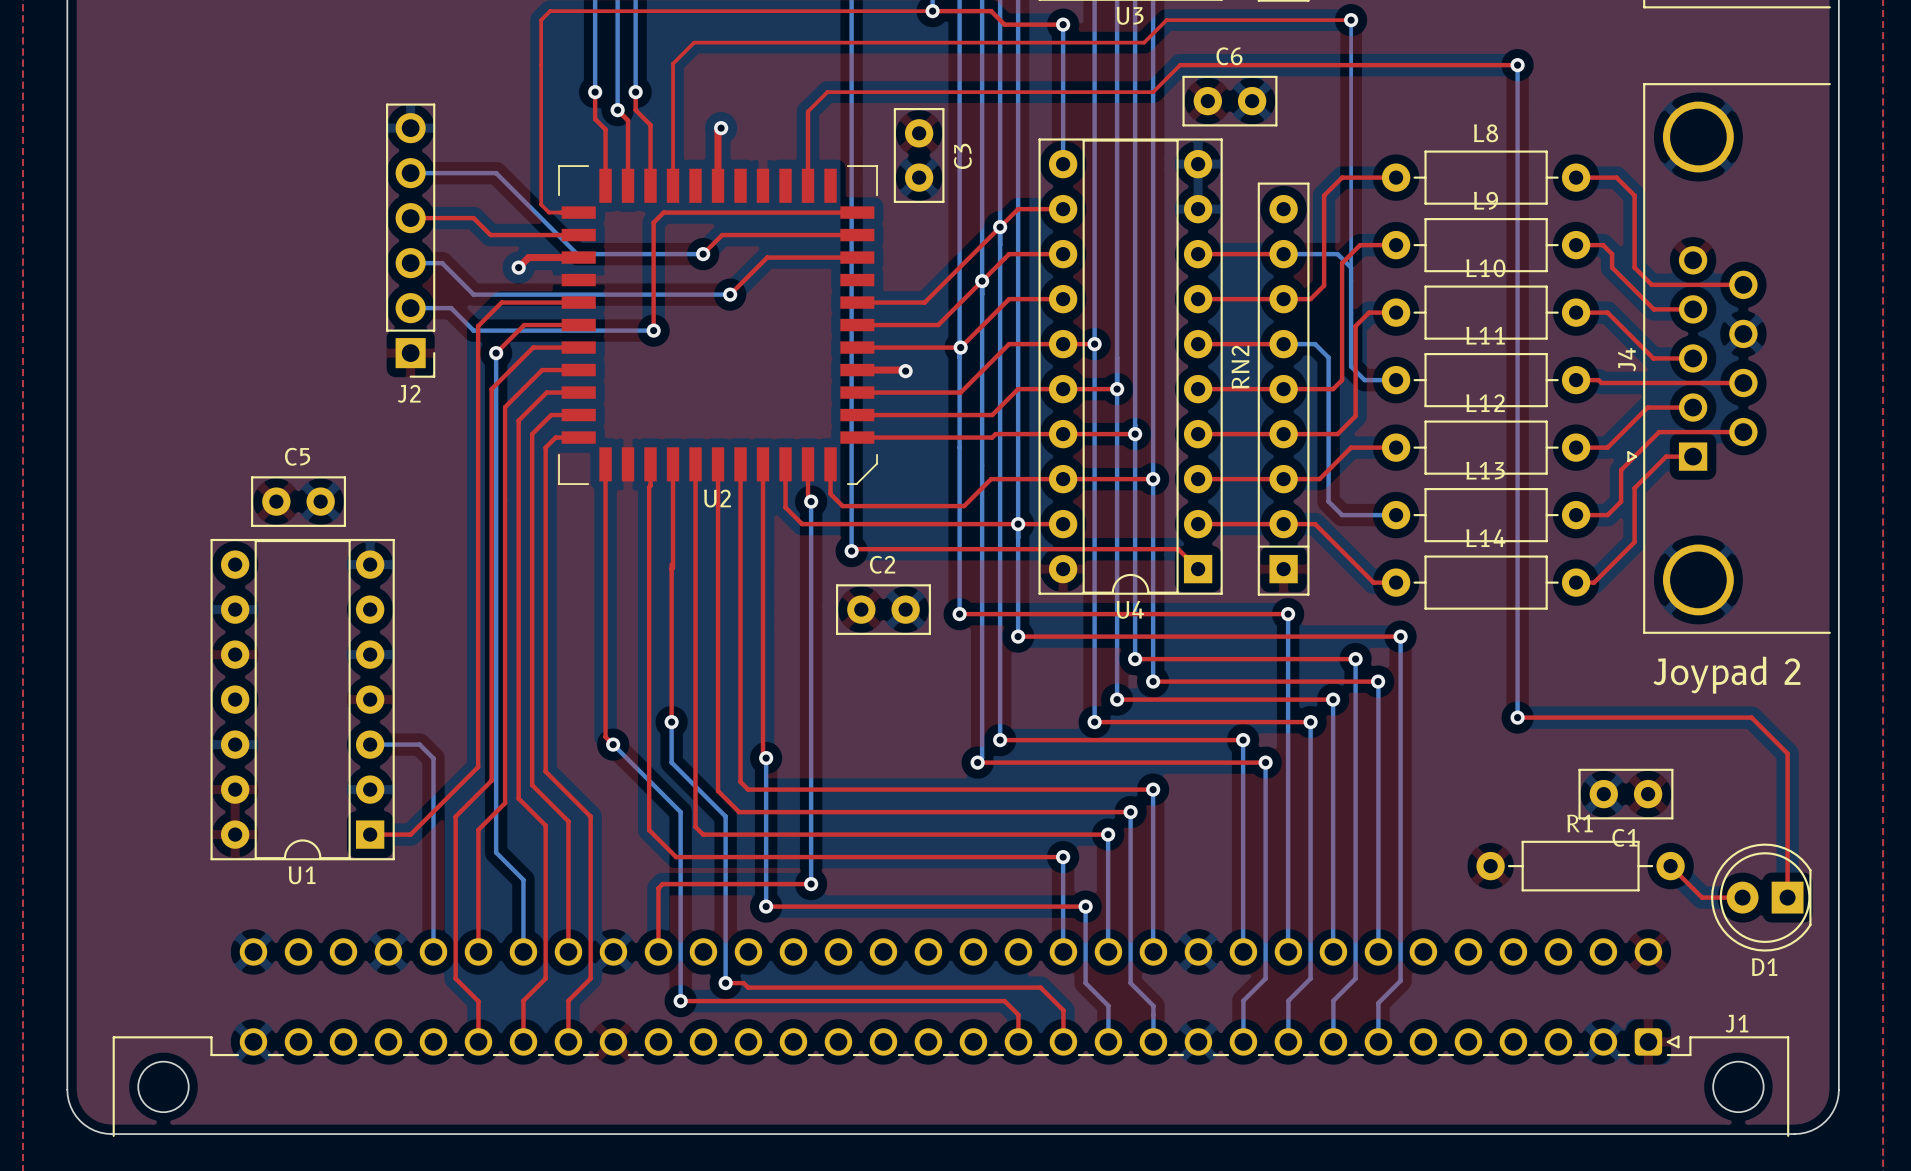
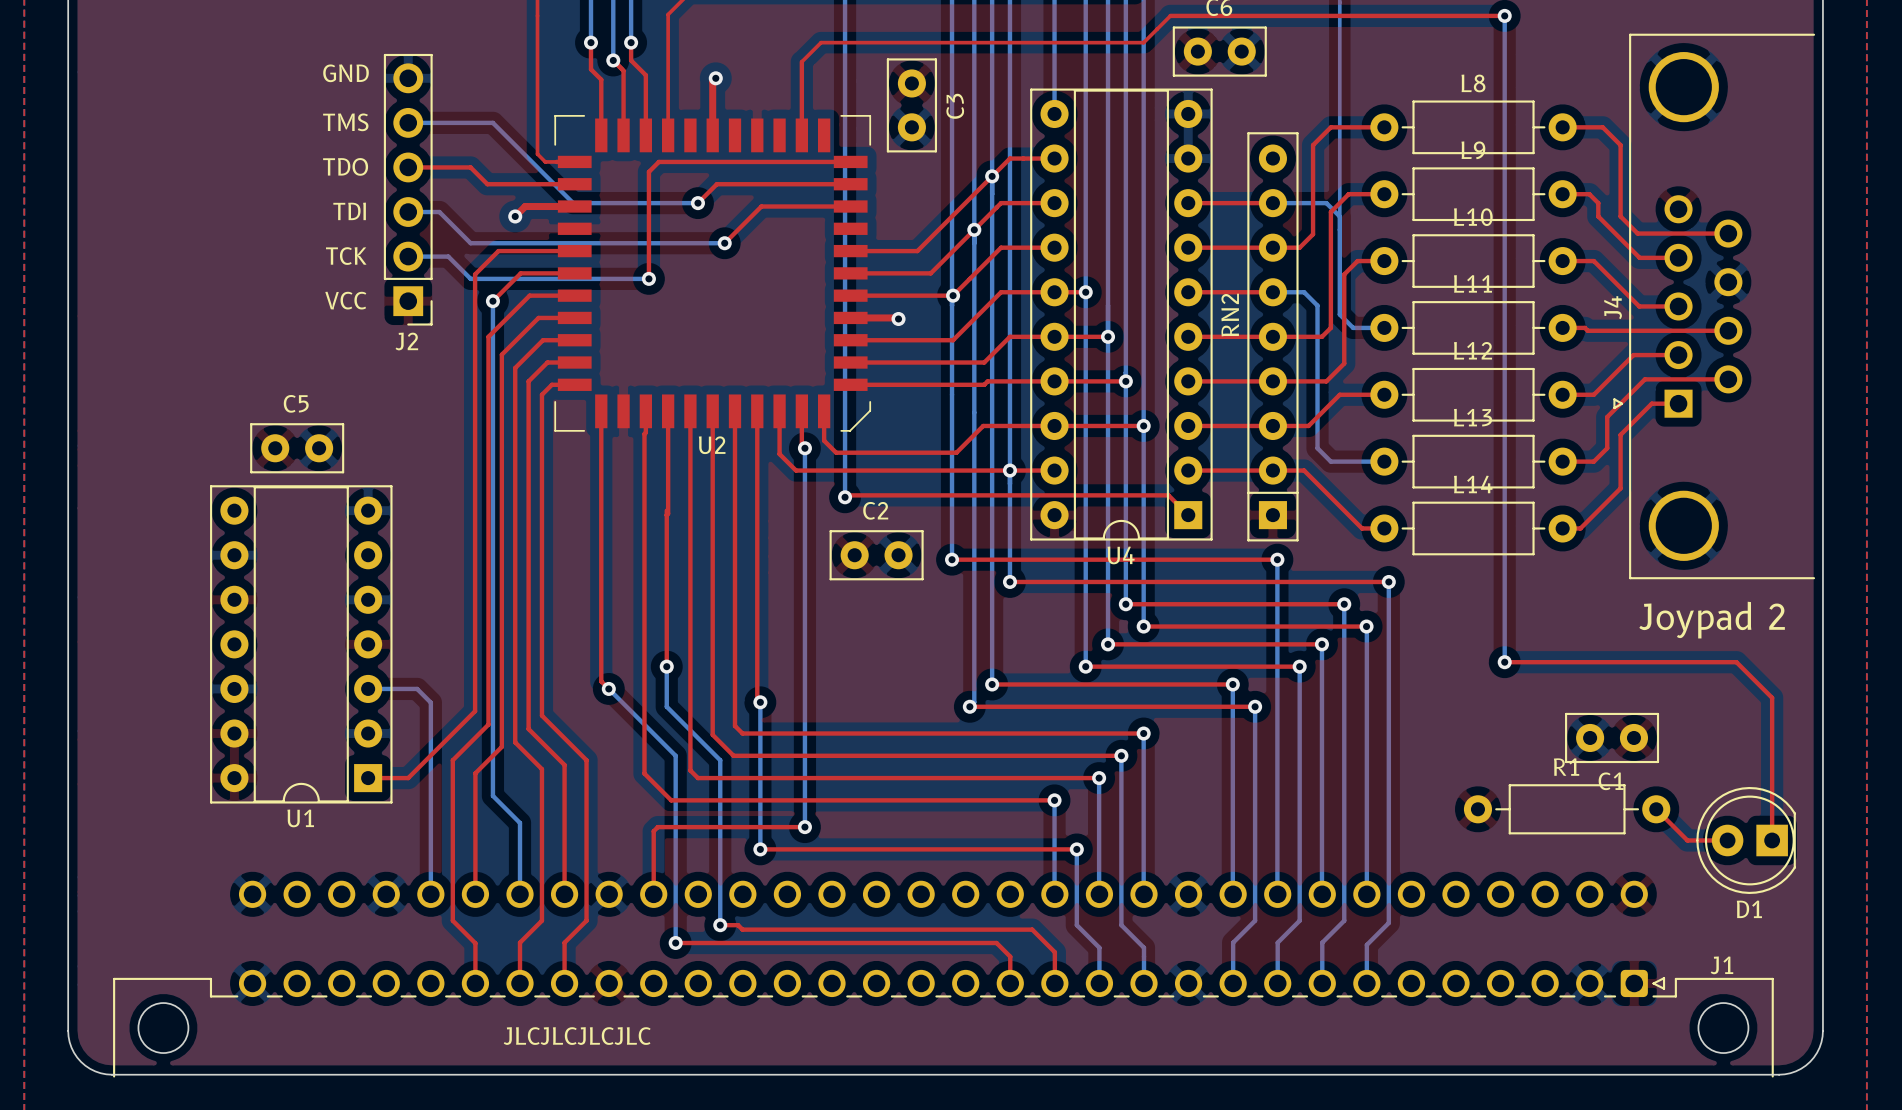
text: none -> GND (346, 73)
text: none -> TMS (345, 122)
text: none -> TDO (345, 166)
text: none -> TDI (349, 211)
text: none -> TCK (346, 256)
text: none -> VCC (345, 300)
text: none -> JLCJLCJLCJLC (577, 1036)

